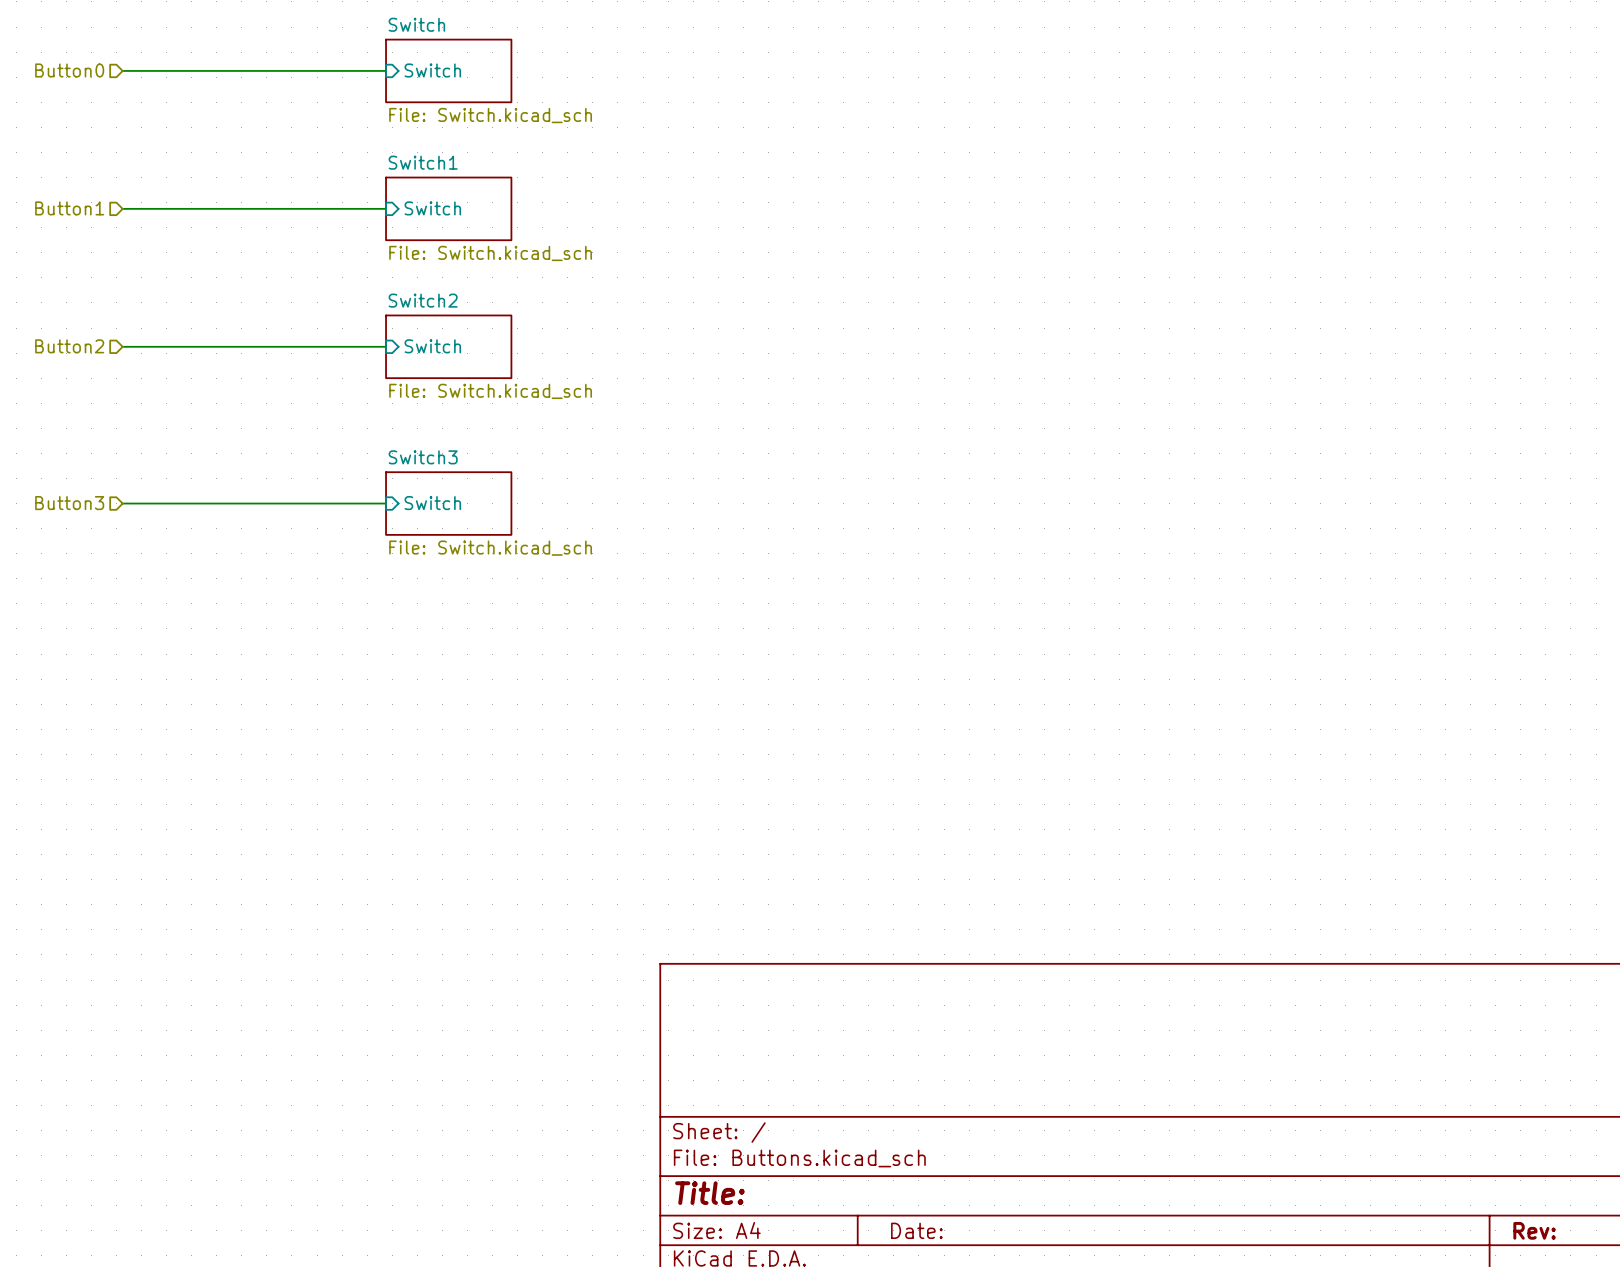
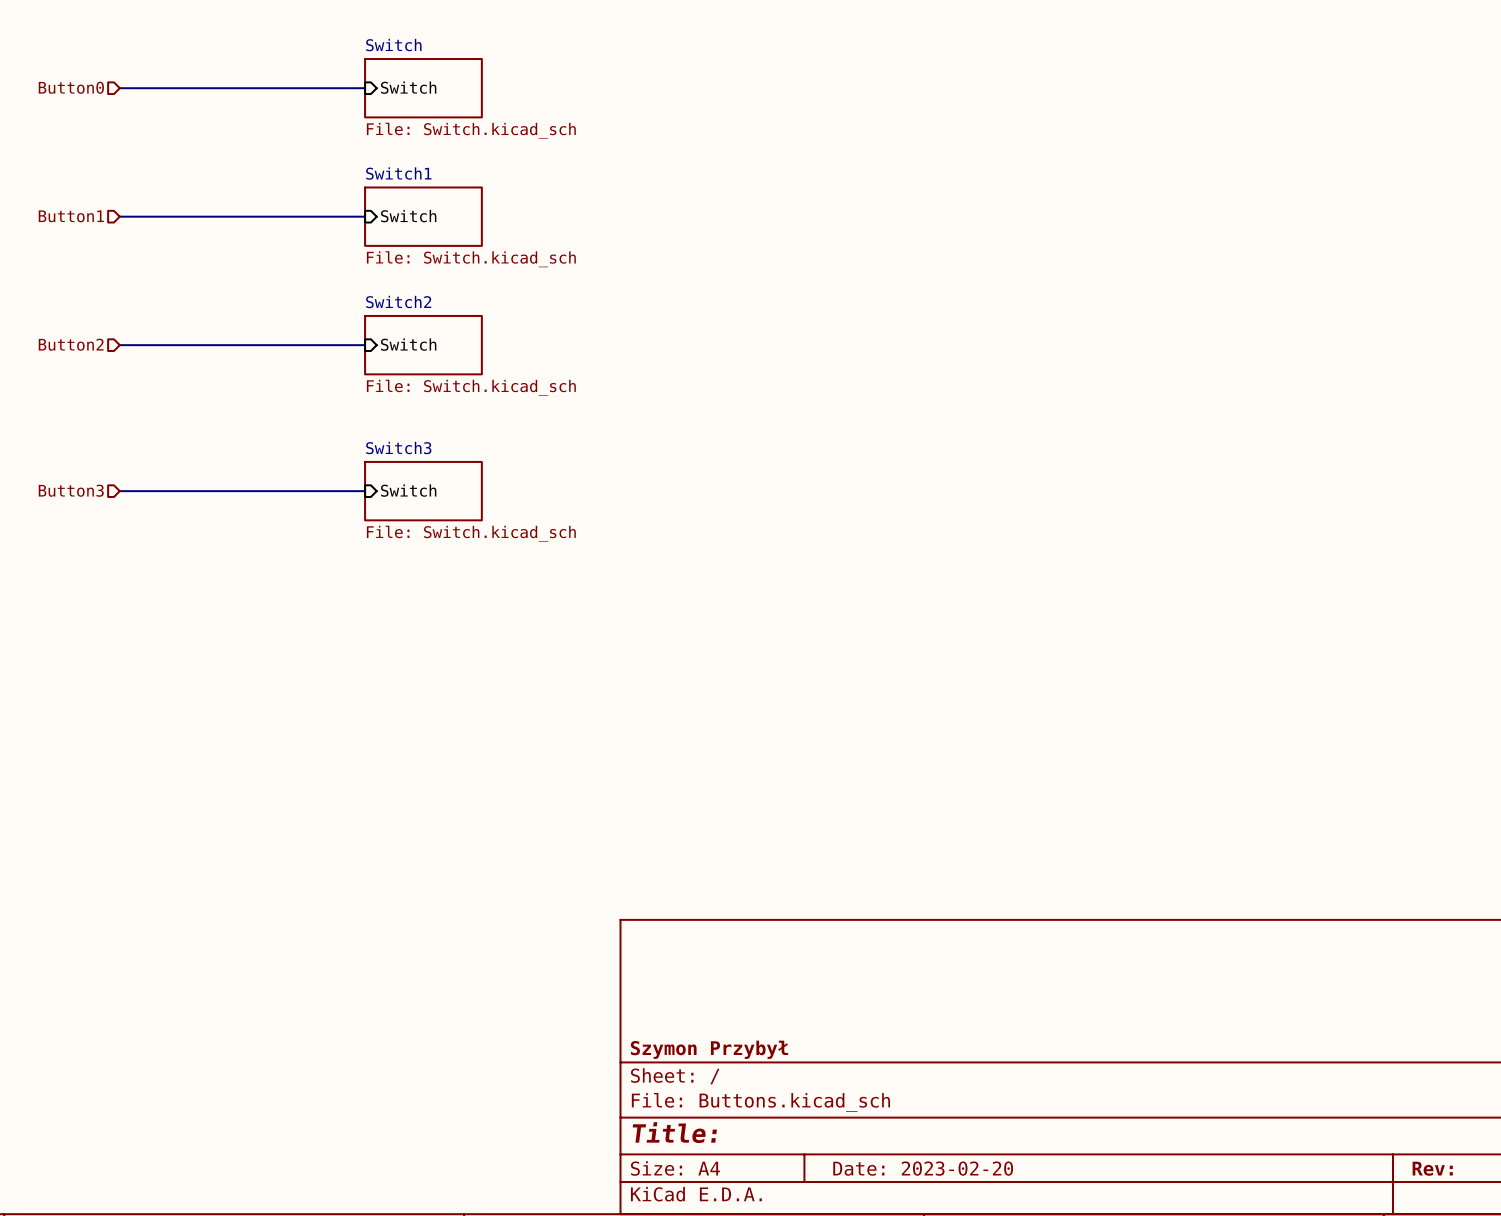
title block: none -> Szymon Przybył (709, 1049)
title block: Date: (916, 1230) -> Date: 2023-02-20 (923, 1168)

